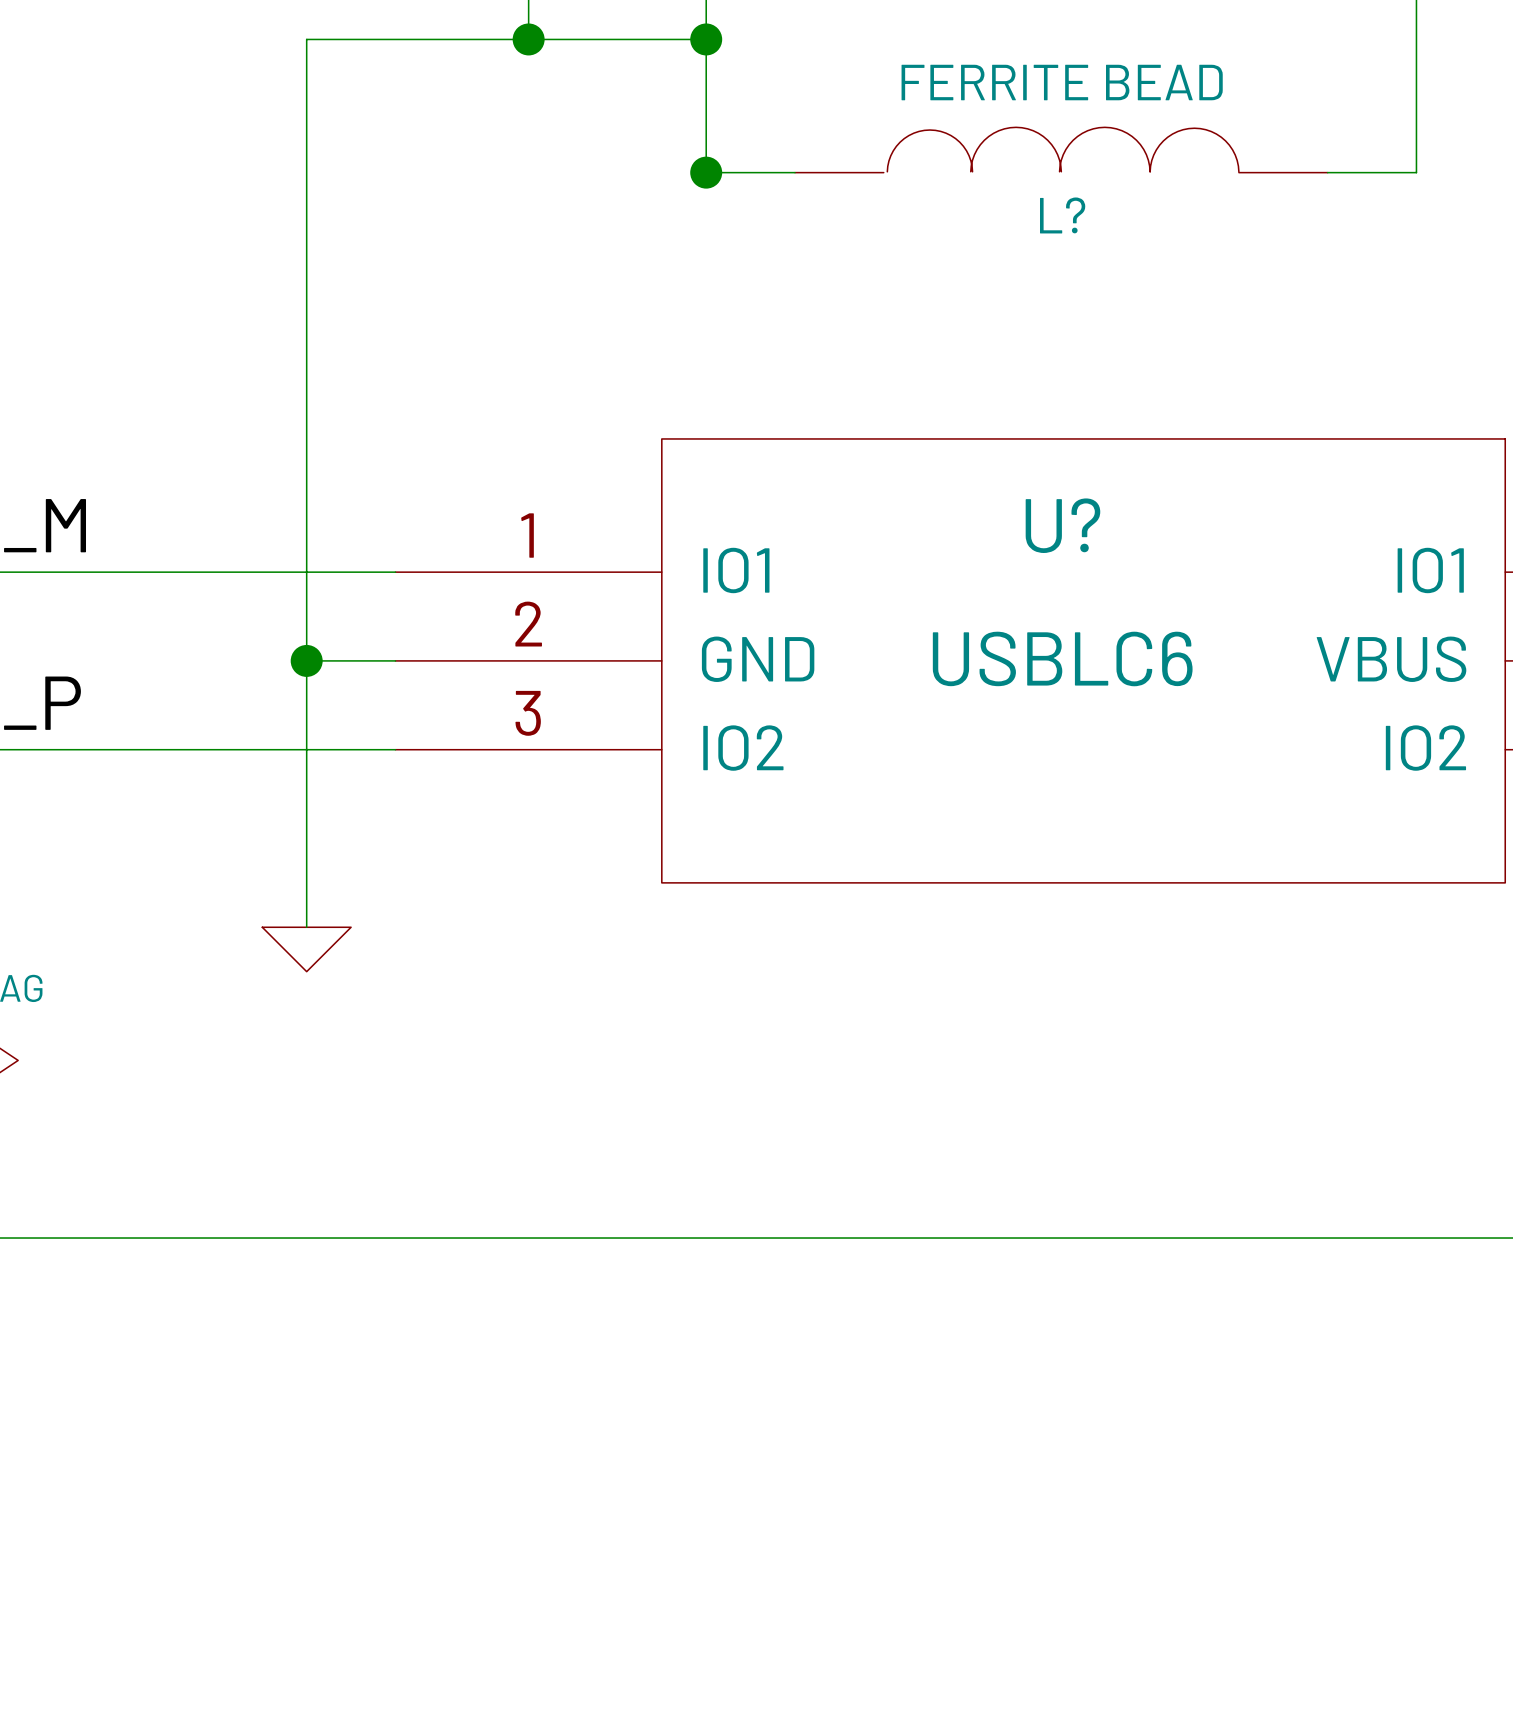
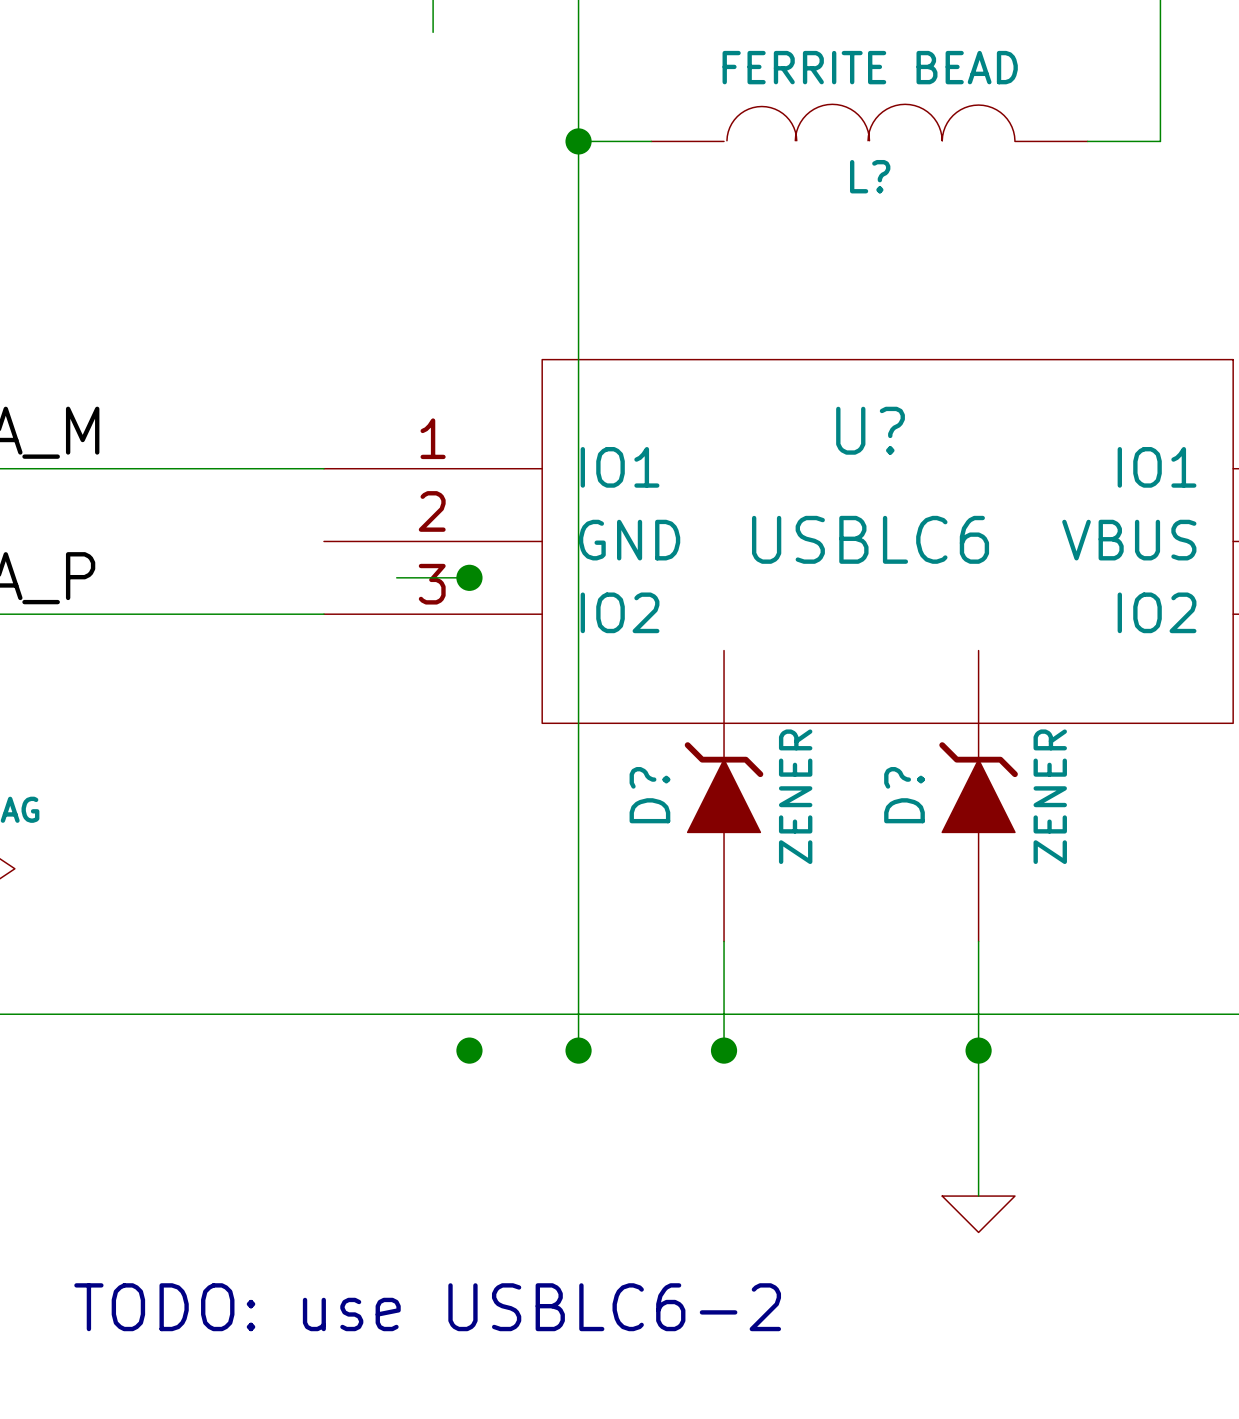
junction: (528, 39) -> none
wire: (706, 39) (306, 39) (306, 927) -> none
junction: (706, 39) -> none
wire: none -> (578, 141) (578, 1050)
wire: (306, 660) (395, 660) -> (396, 577) (469, 577)
junction: (306, 660) -> none
junction: none -> (469, 577)
power symbol: (306, 949) -> none
D?: none -> ZENER (724, 796)
D?: none -> ZENER (978, 796)
wire: none -> (724, 941) (724, 1050)
wire: none -> (978, 941) (978, 1196)
junction: none -> (469, 1050)
junction: none -> (578, 1050)
junction: none -> (724, 1050)
junction: none -> (978, 1050)
power symbol: none -> (978, 1214)
text: none -> TODO: use USBLC6-2 (427, 1307)

